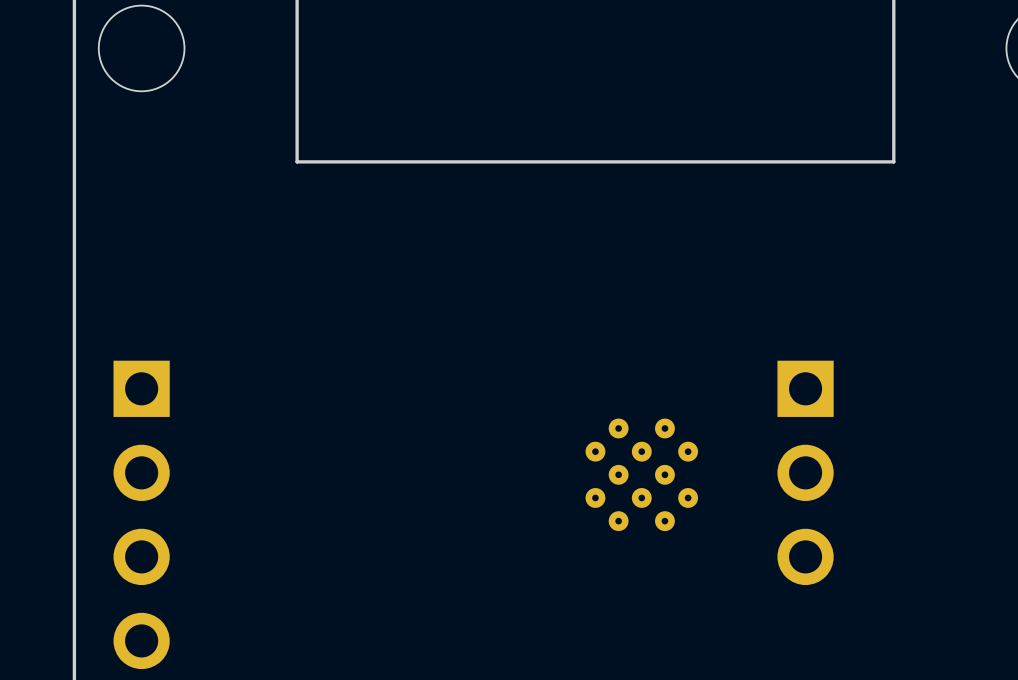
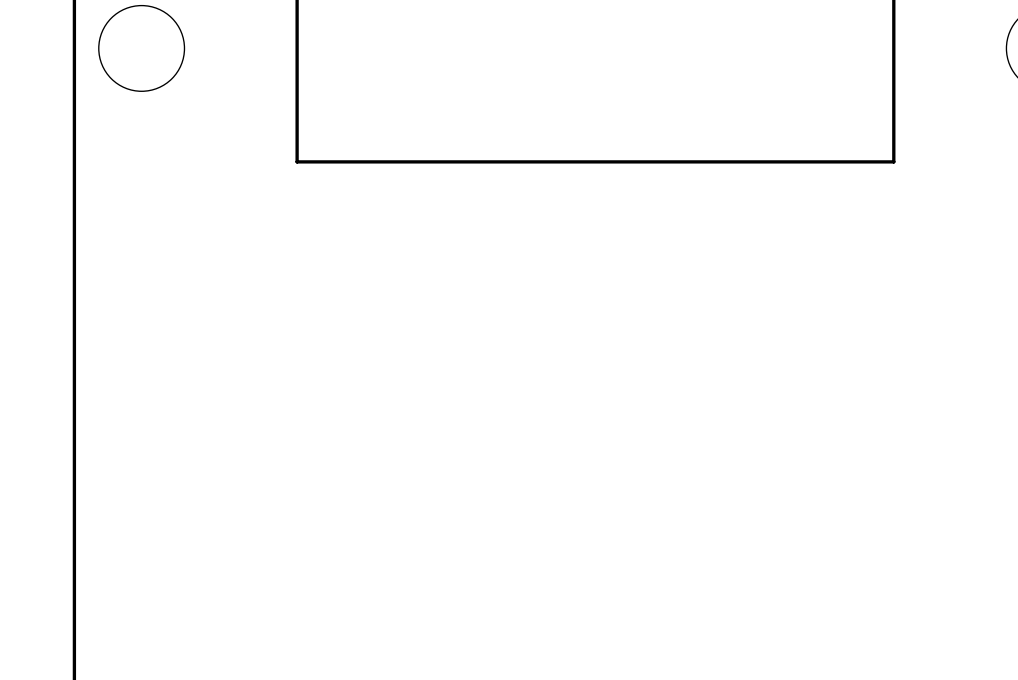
part: (805, 472) -> none
part: (641, 474) -> none
part: (141, 514) -> none

